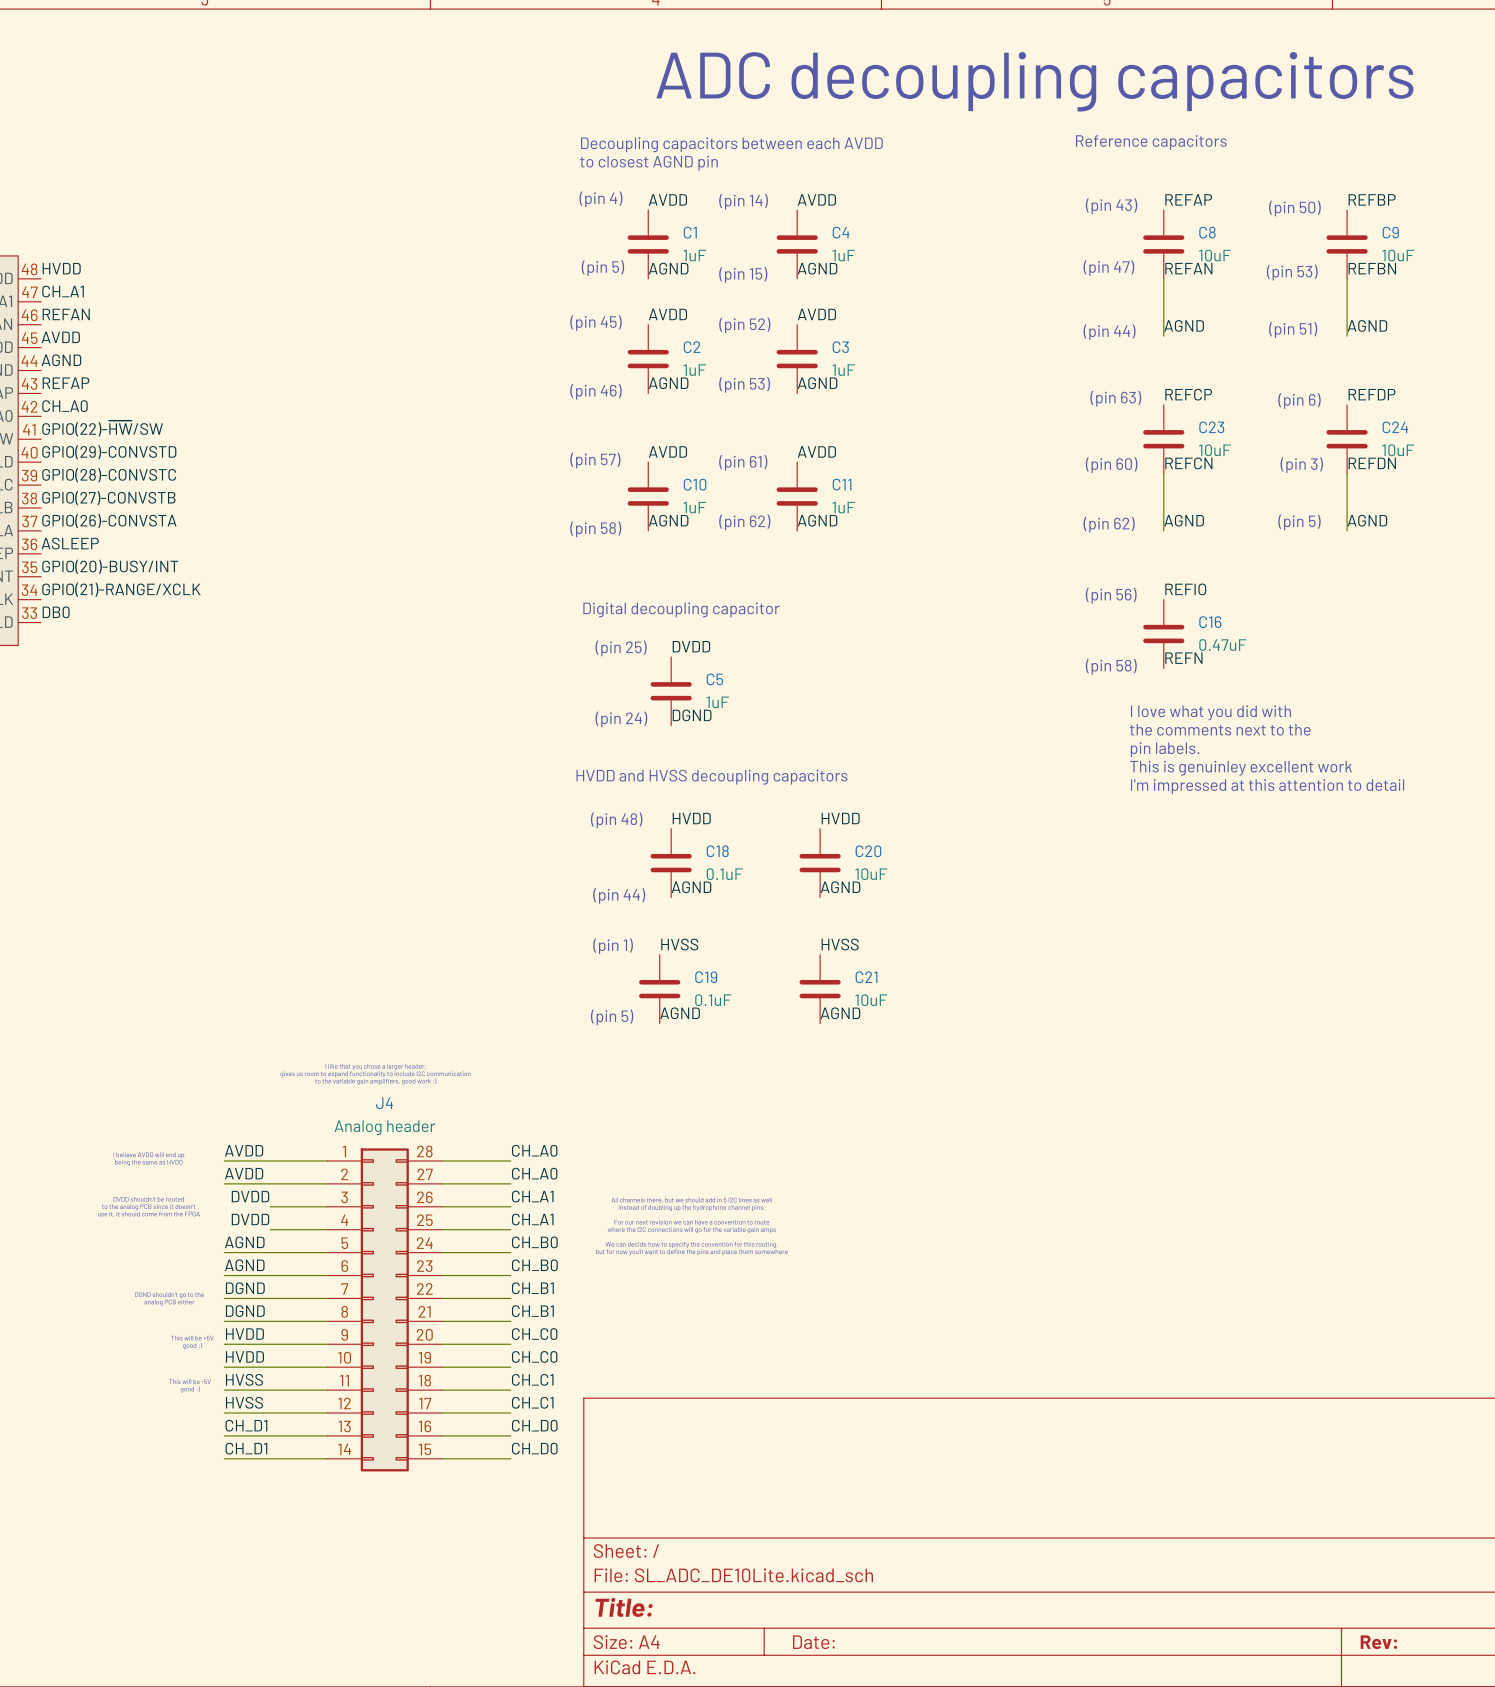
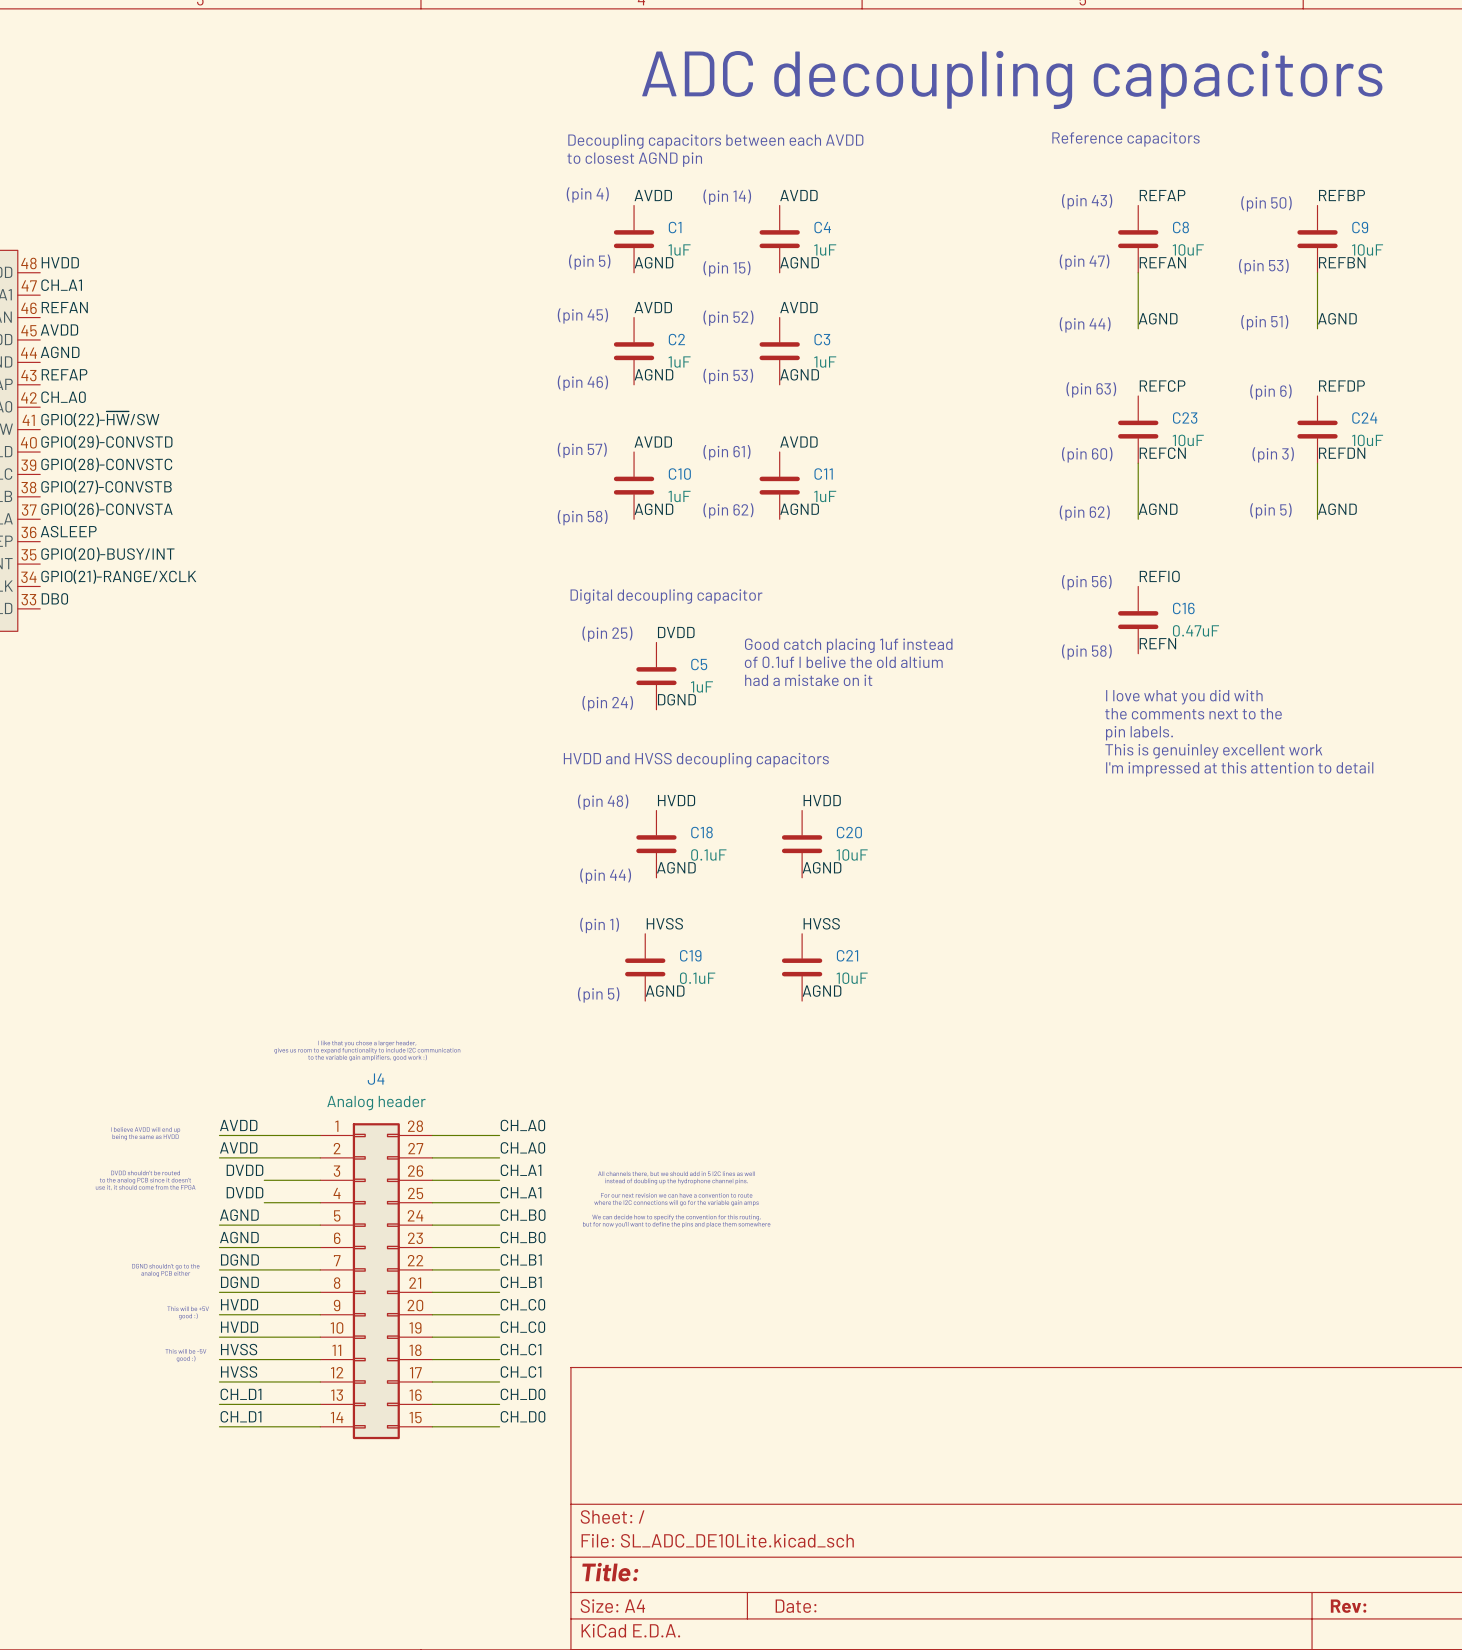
text: none -> Good catch placing 1uf instead (848, 645)
text: none -> of 0.1uf I belive the old altium (843, 662)
text: none -> had a mistake on it (808, 680)

